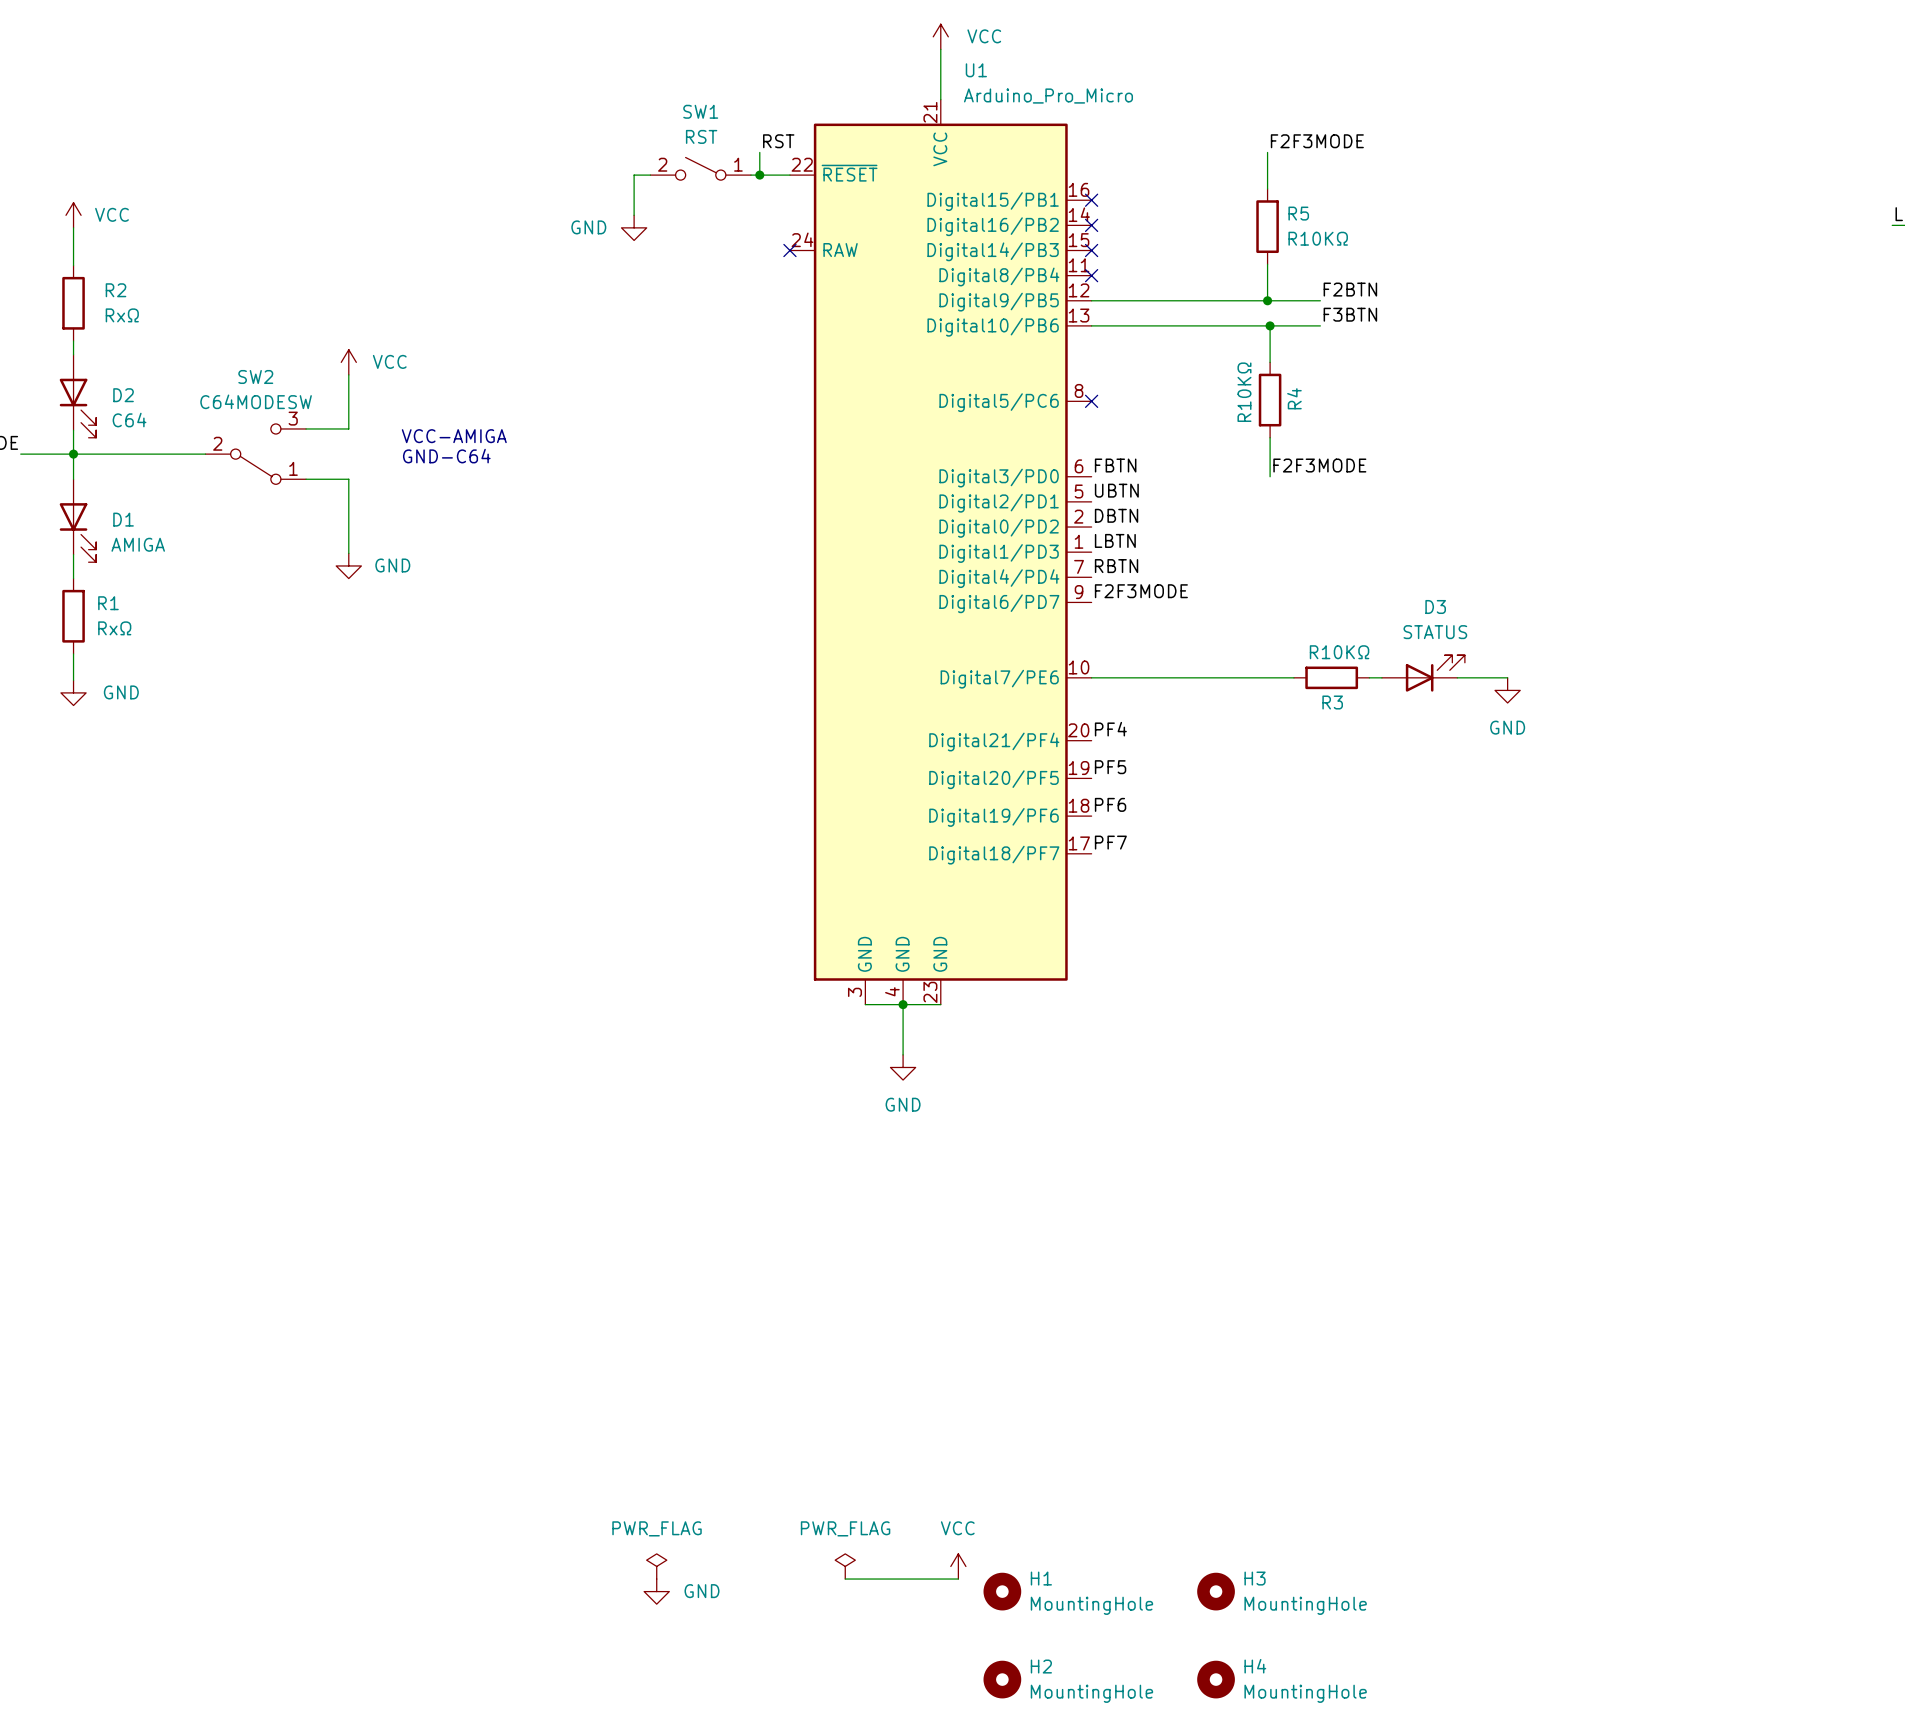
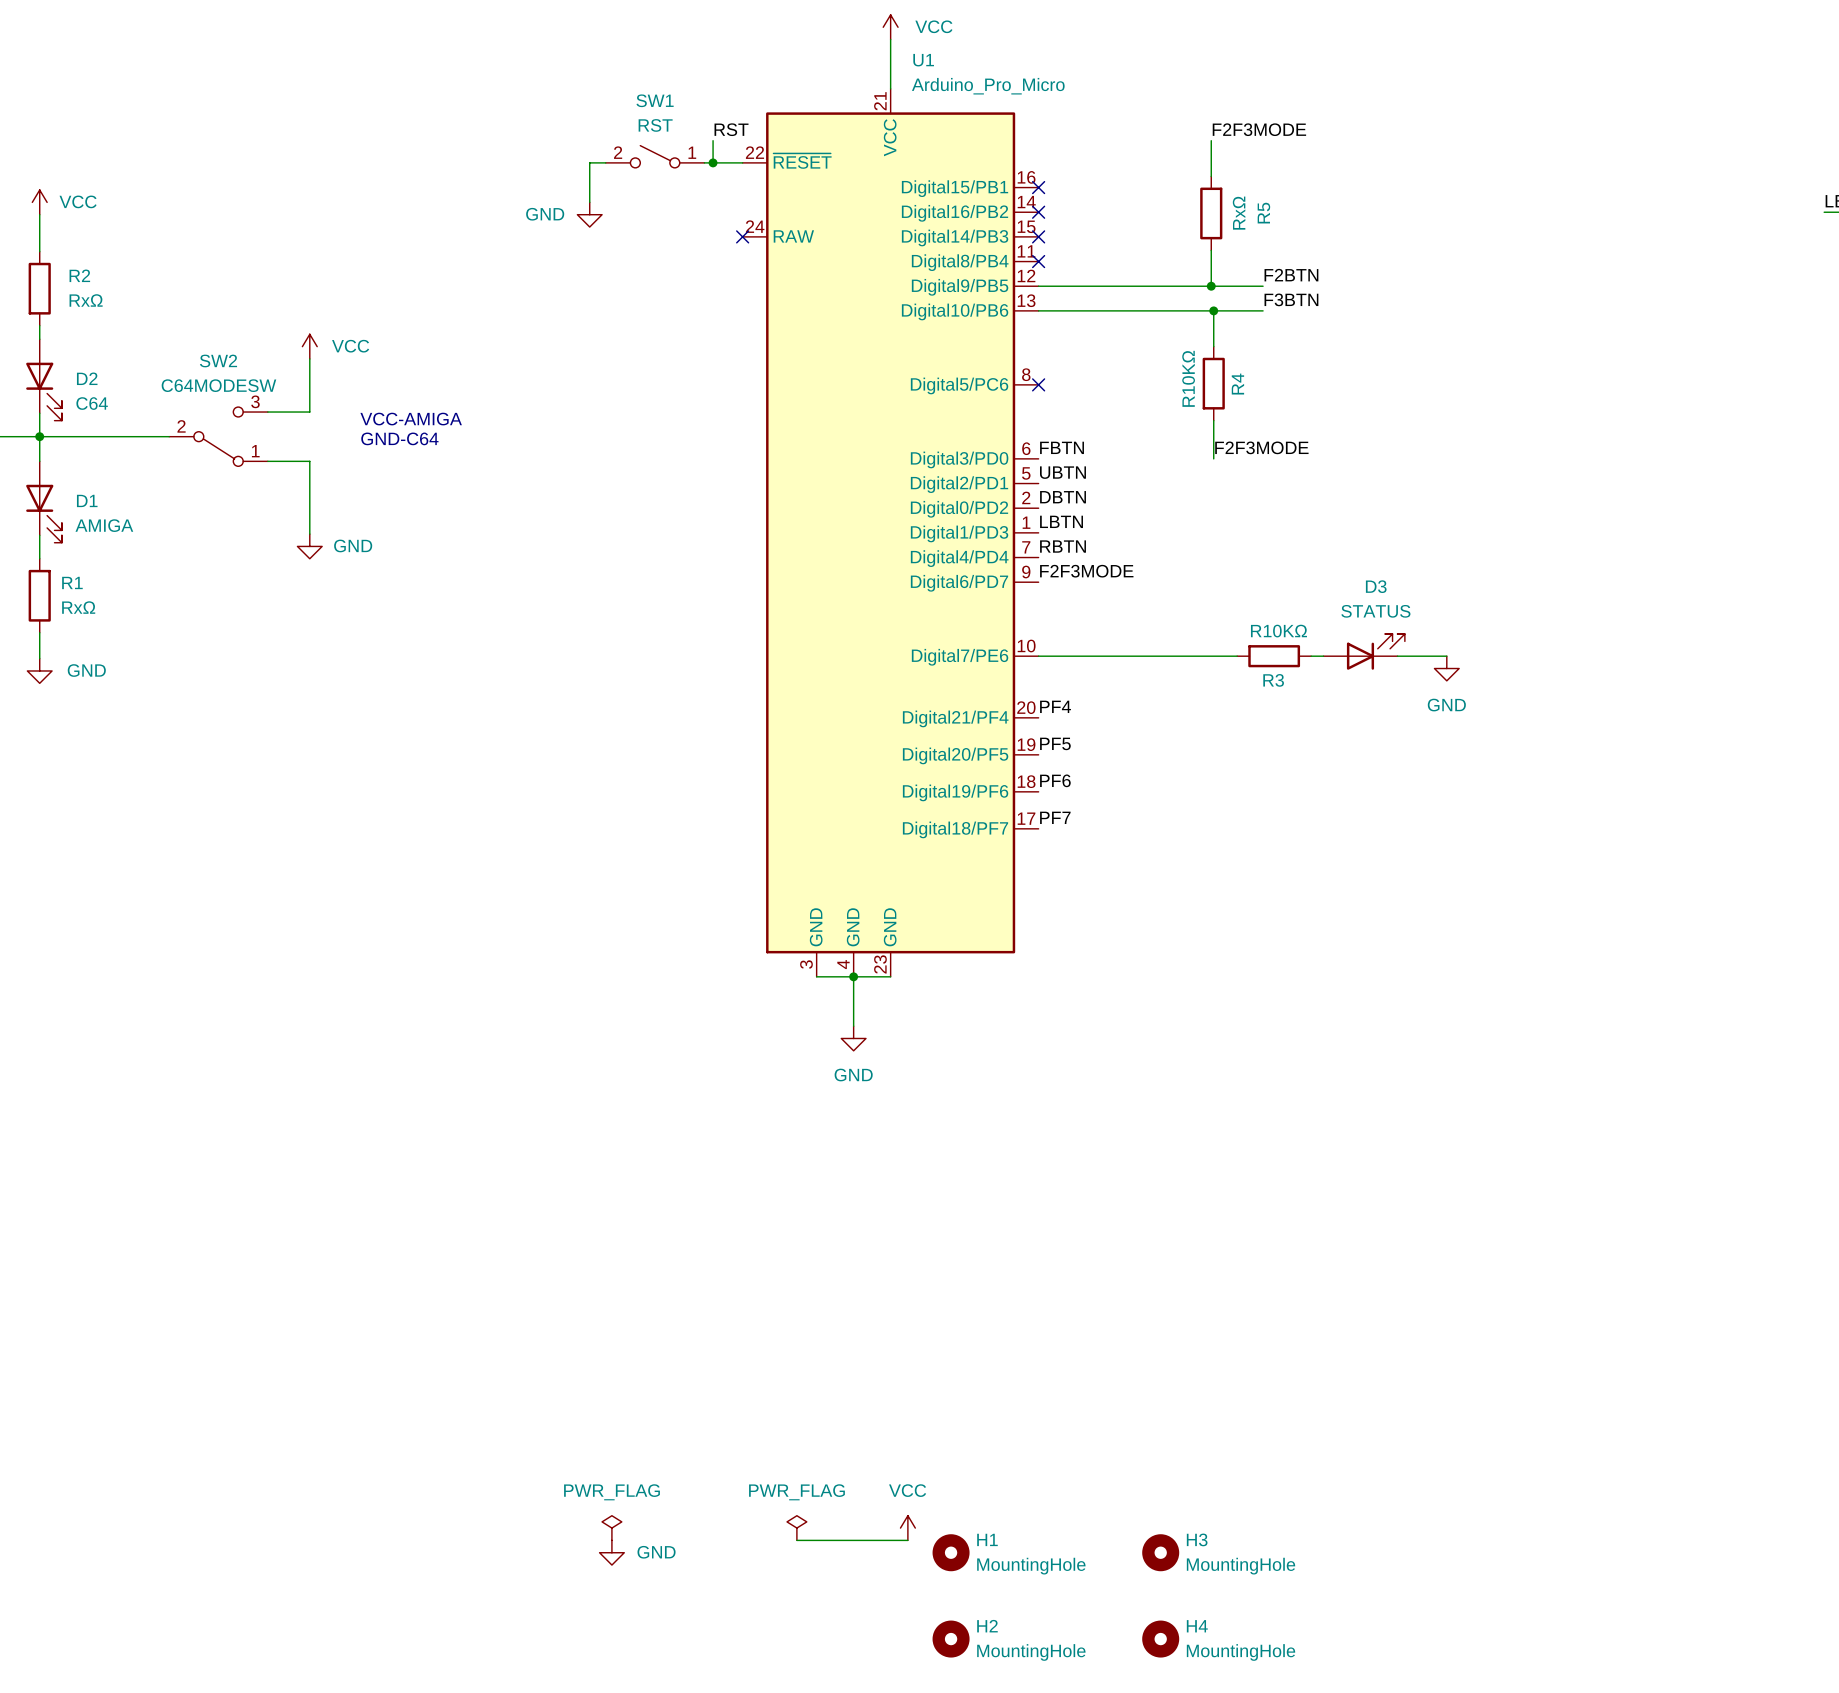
R5 name rotation: 0° (1298, 213) -> 90° counterclockwise (1263, 213)
R5 value: R10KΩ (1318, 238) -> RxΩ (1239, 213)

